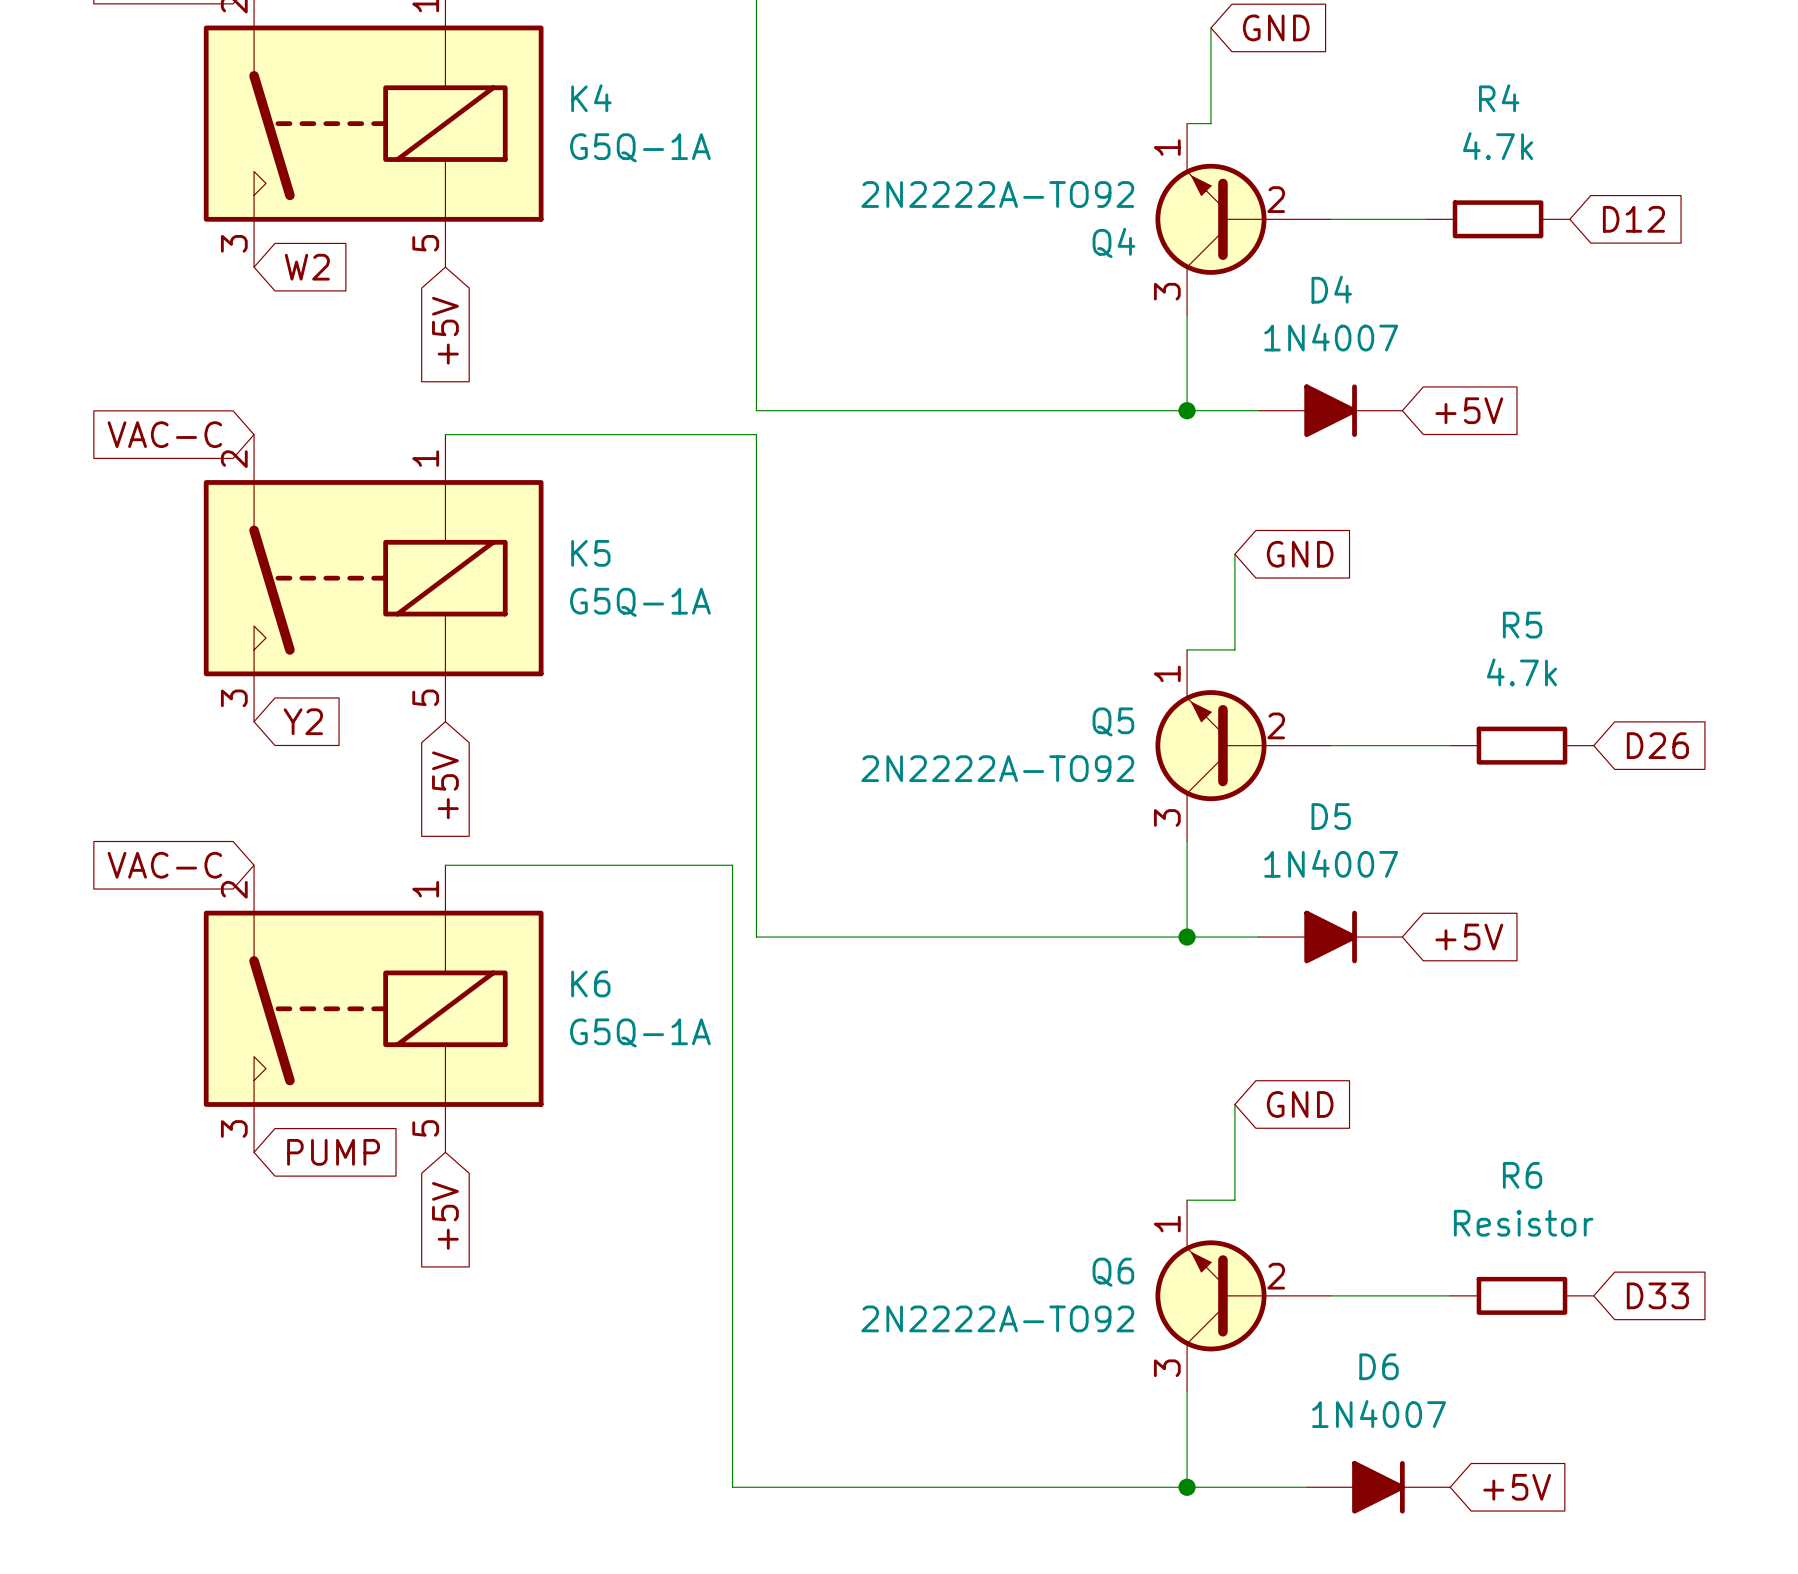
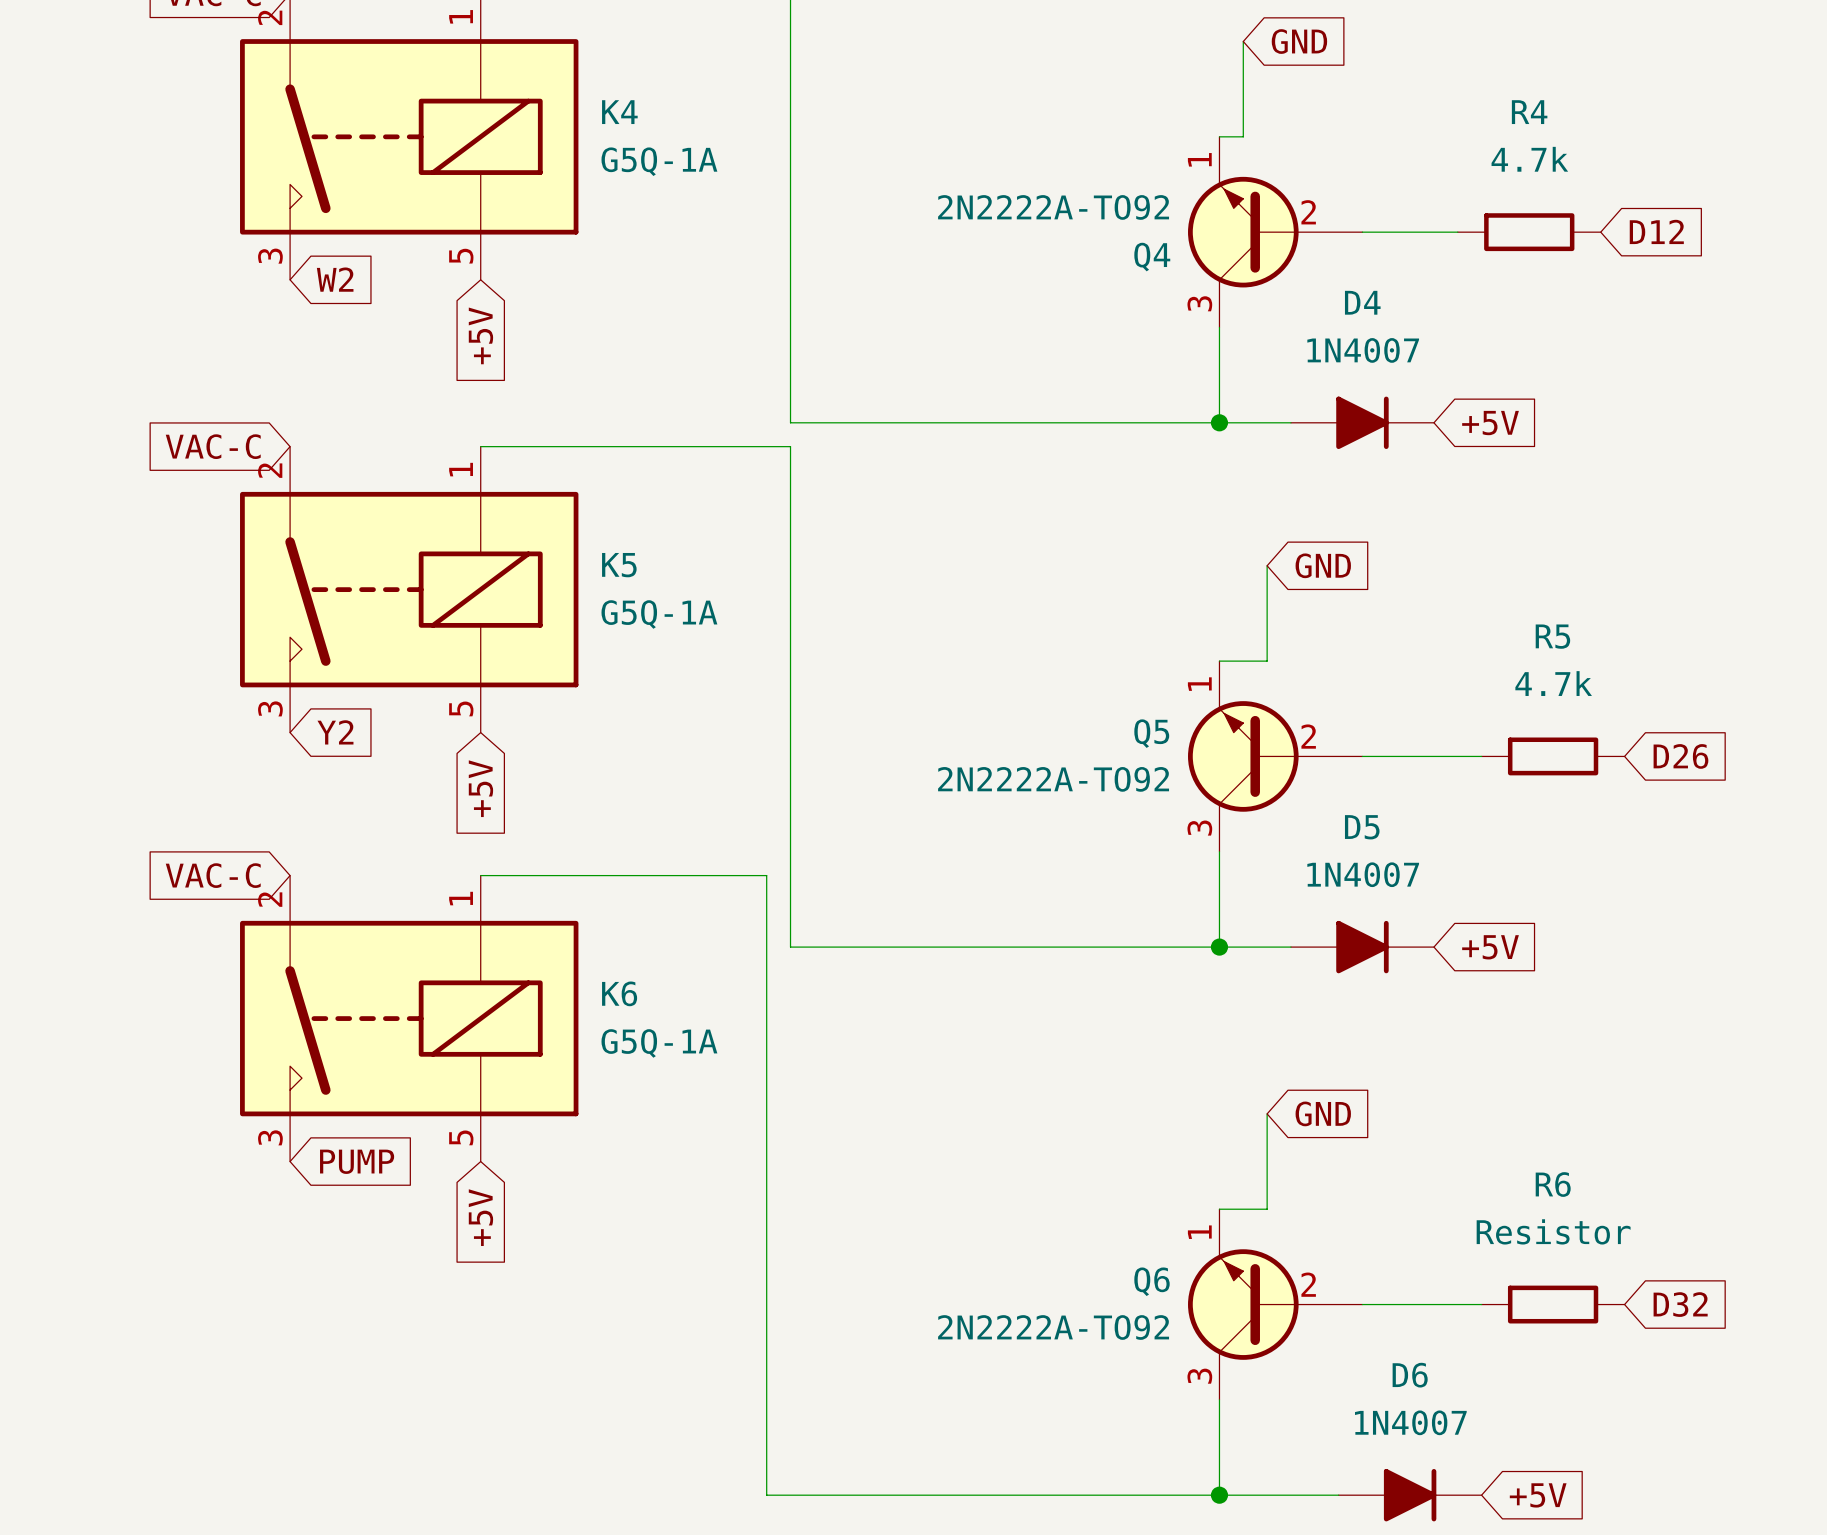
global label: D33 (1657, 1295) -> D32 (1680, 1304)

